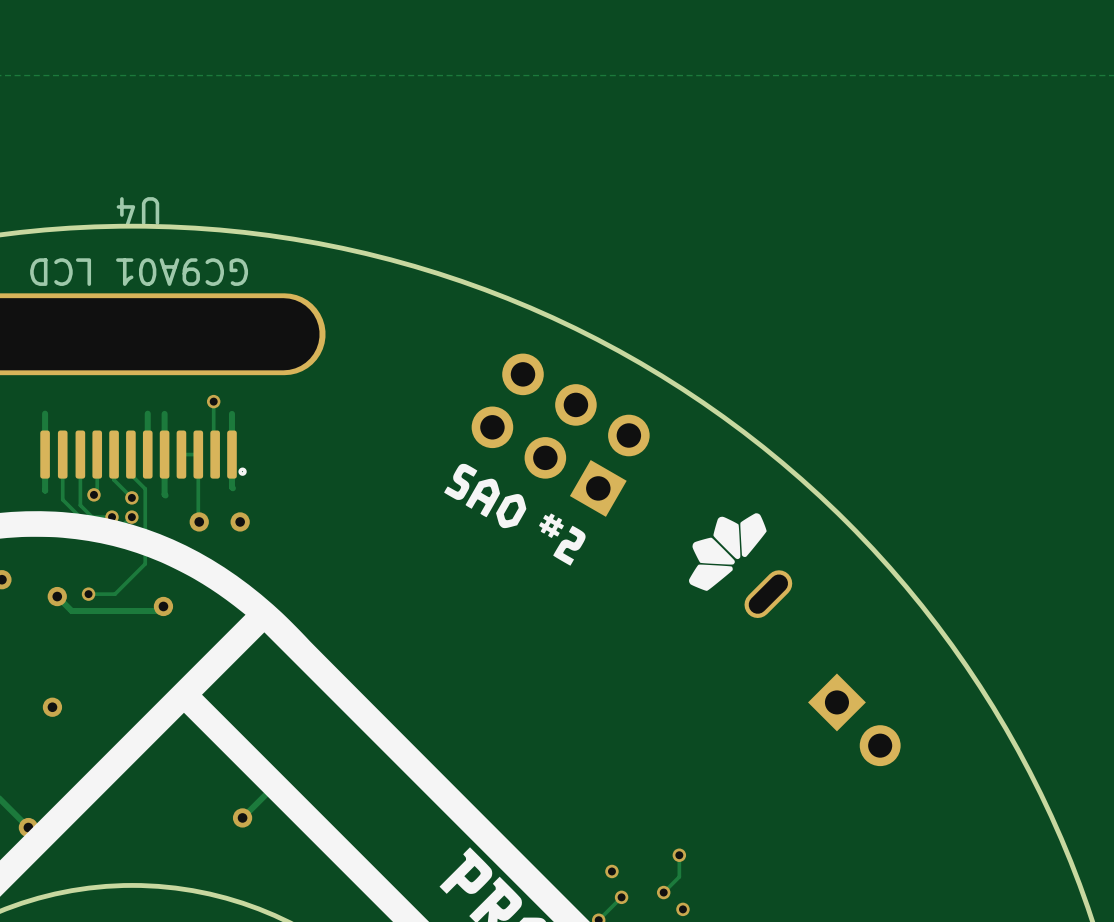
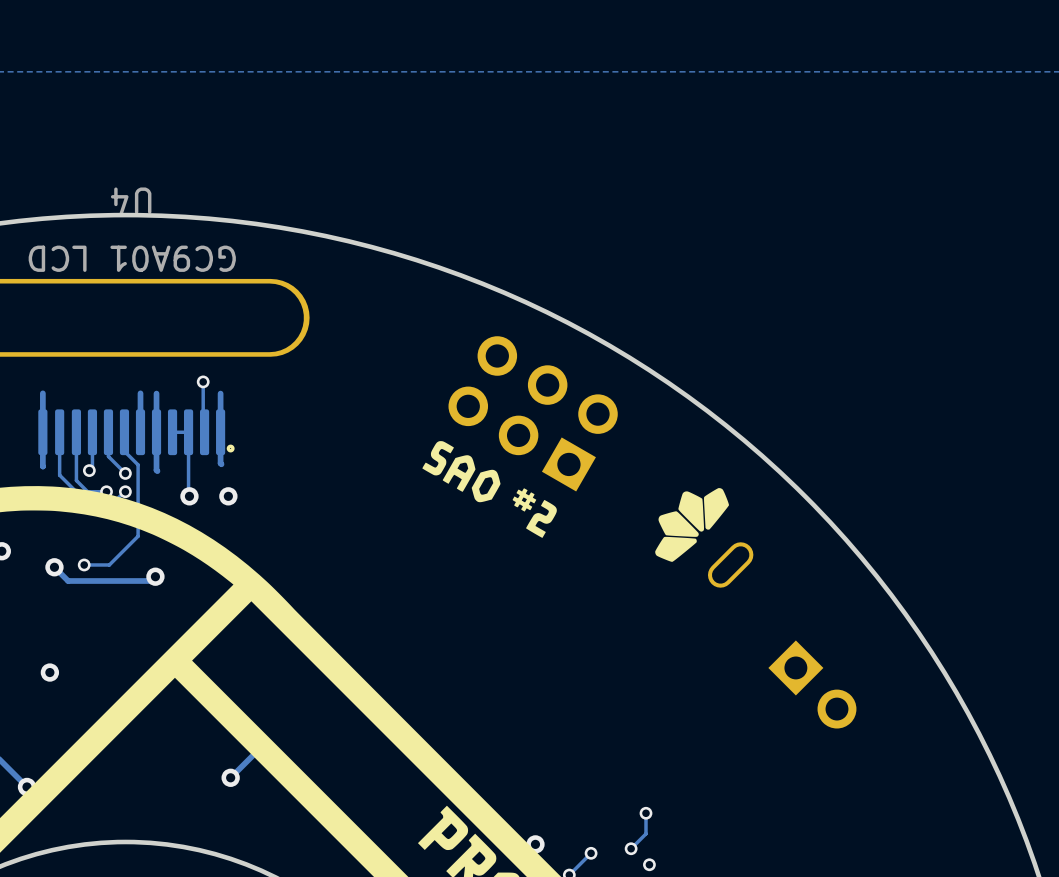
via: (611, 871) -> none
via: none -> (535, 844)

